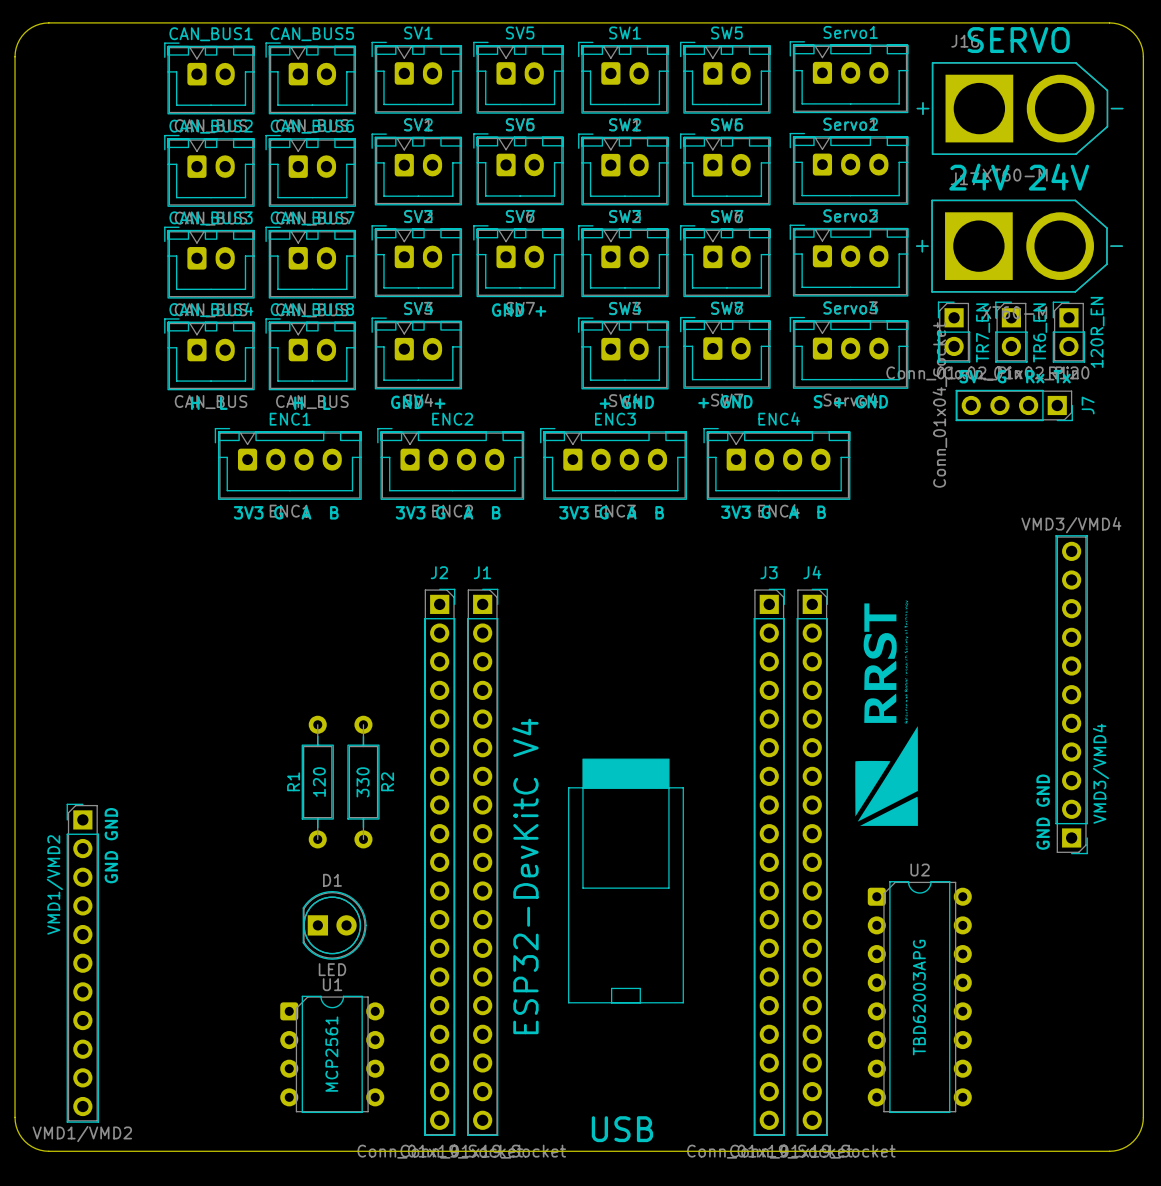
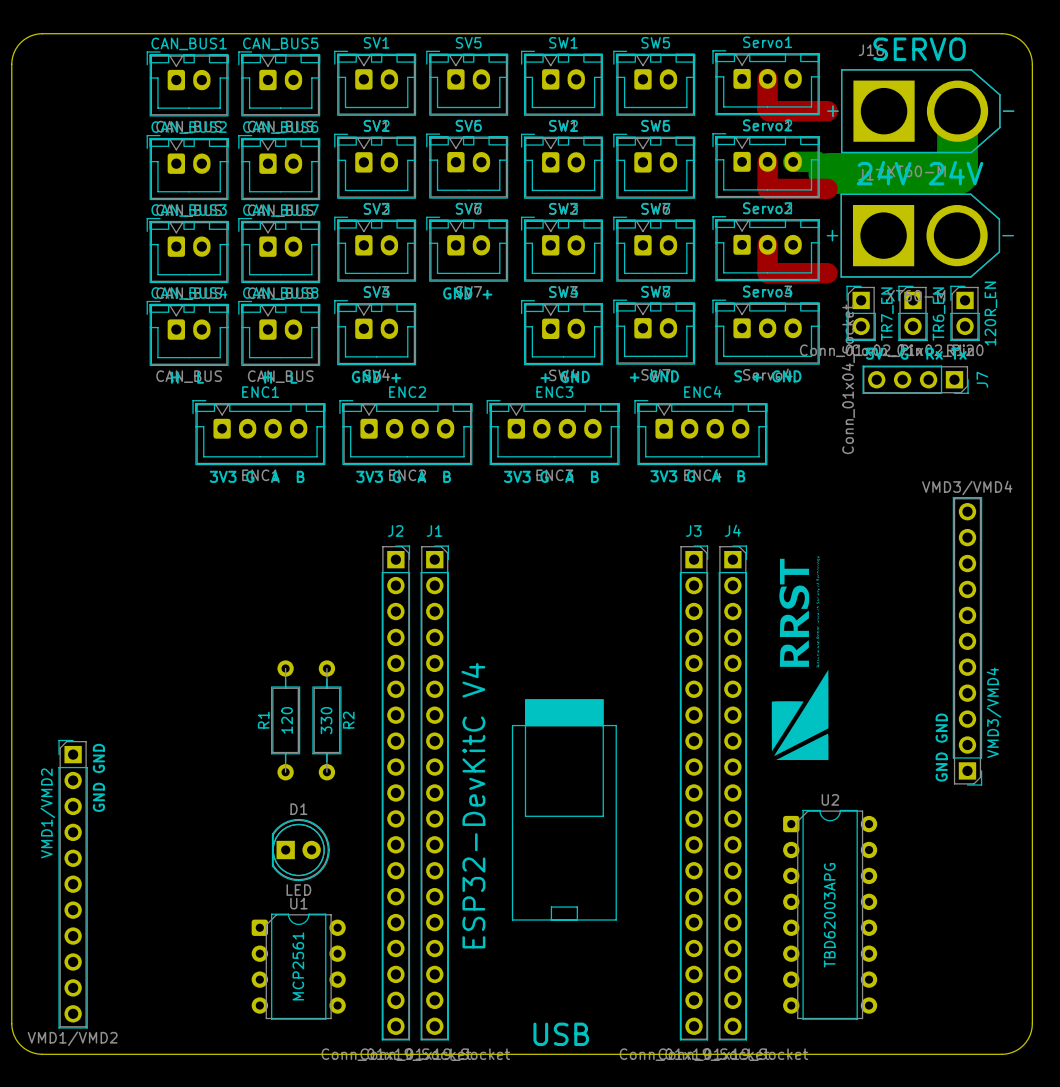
top track: none -> (767, 78) (767, 109) (769, 111) (827, 111)
bottom track: none -> (957, 111) (957, 174) (828, 173) (817, 161) (793, 161)
top track: none -> (767, 161) (767, 188) (827, 188)
top track: none -> (767, 244) (767, 273) (827, 273)

